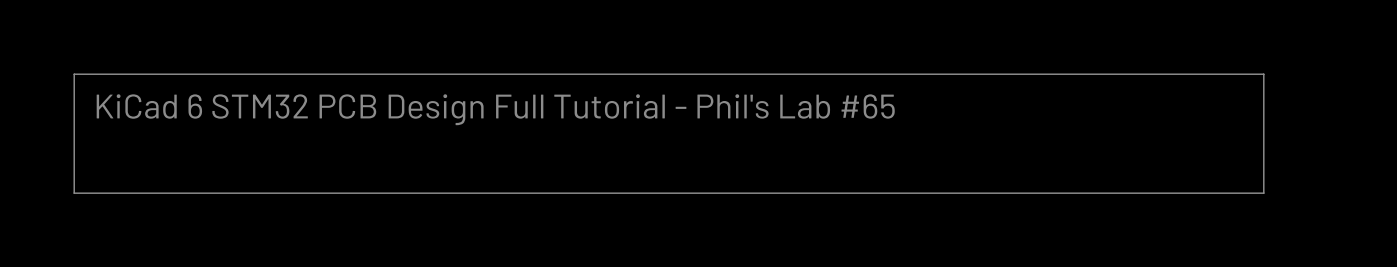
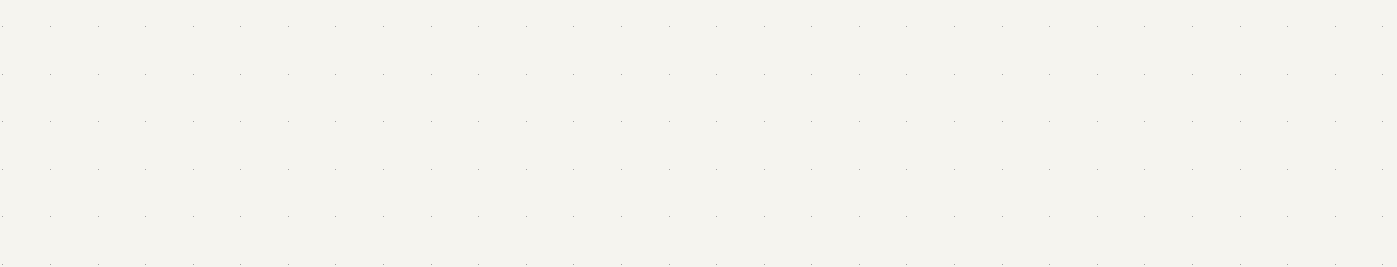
line: (74, 74) (1263, 74) (1263, 193) (74, 193) (74, 74) -> none
text: KiCad 6 STM32 PCB Design Full Tutorial - Phil's Lab #65 (495, 109) -> none

